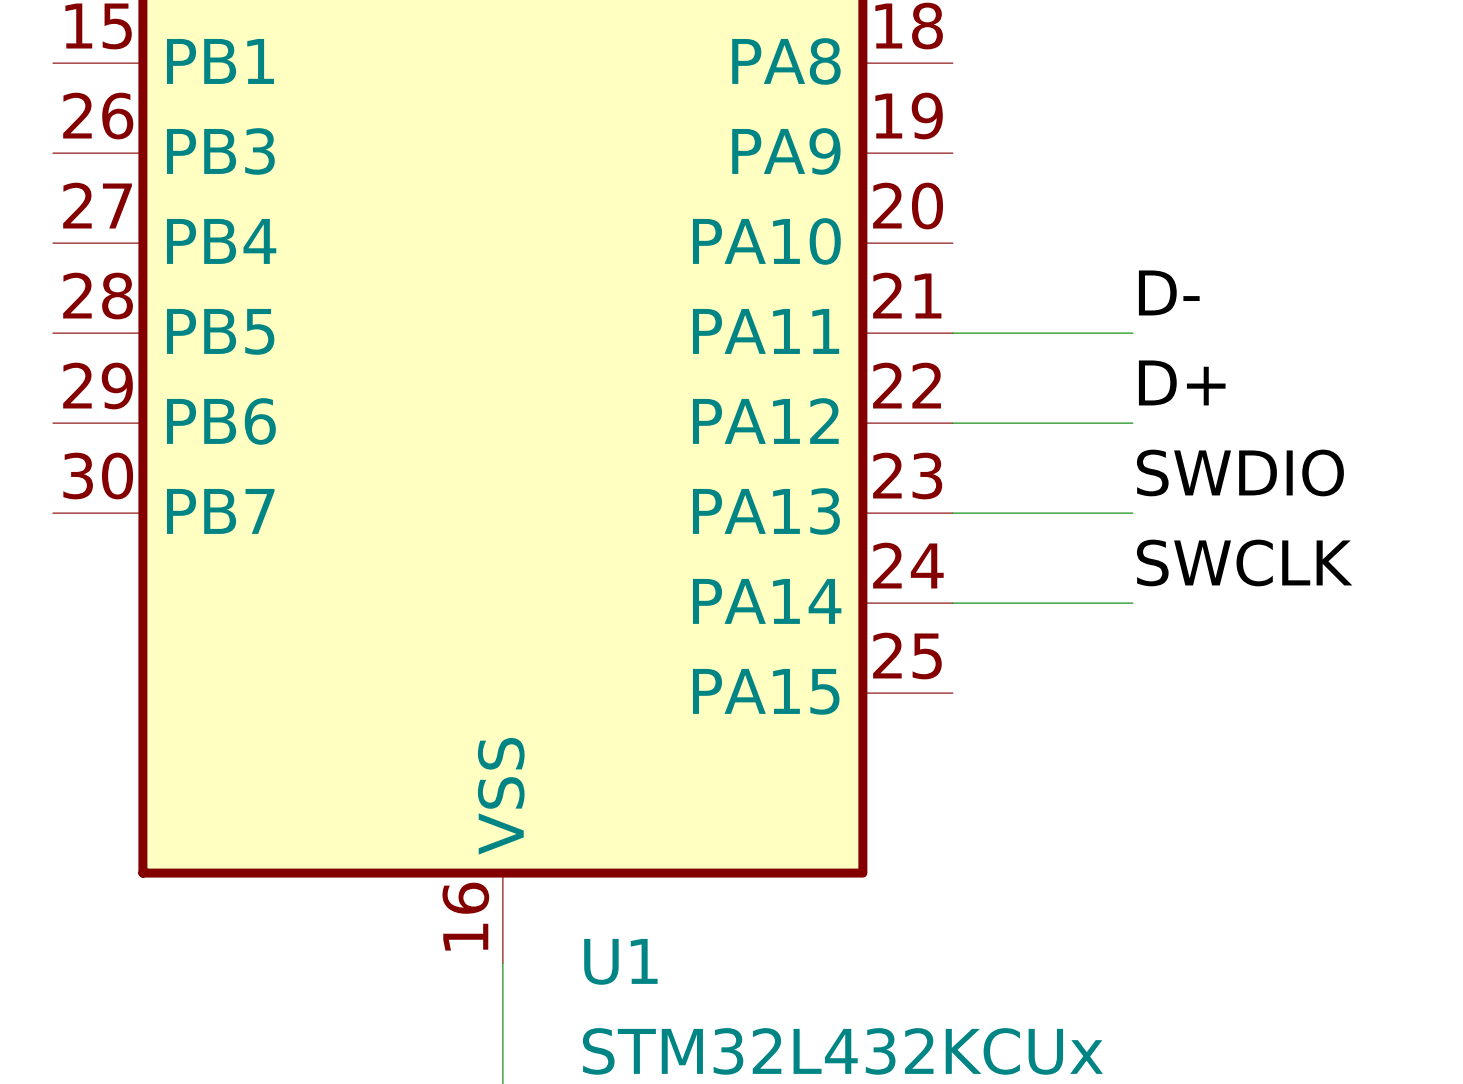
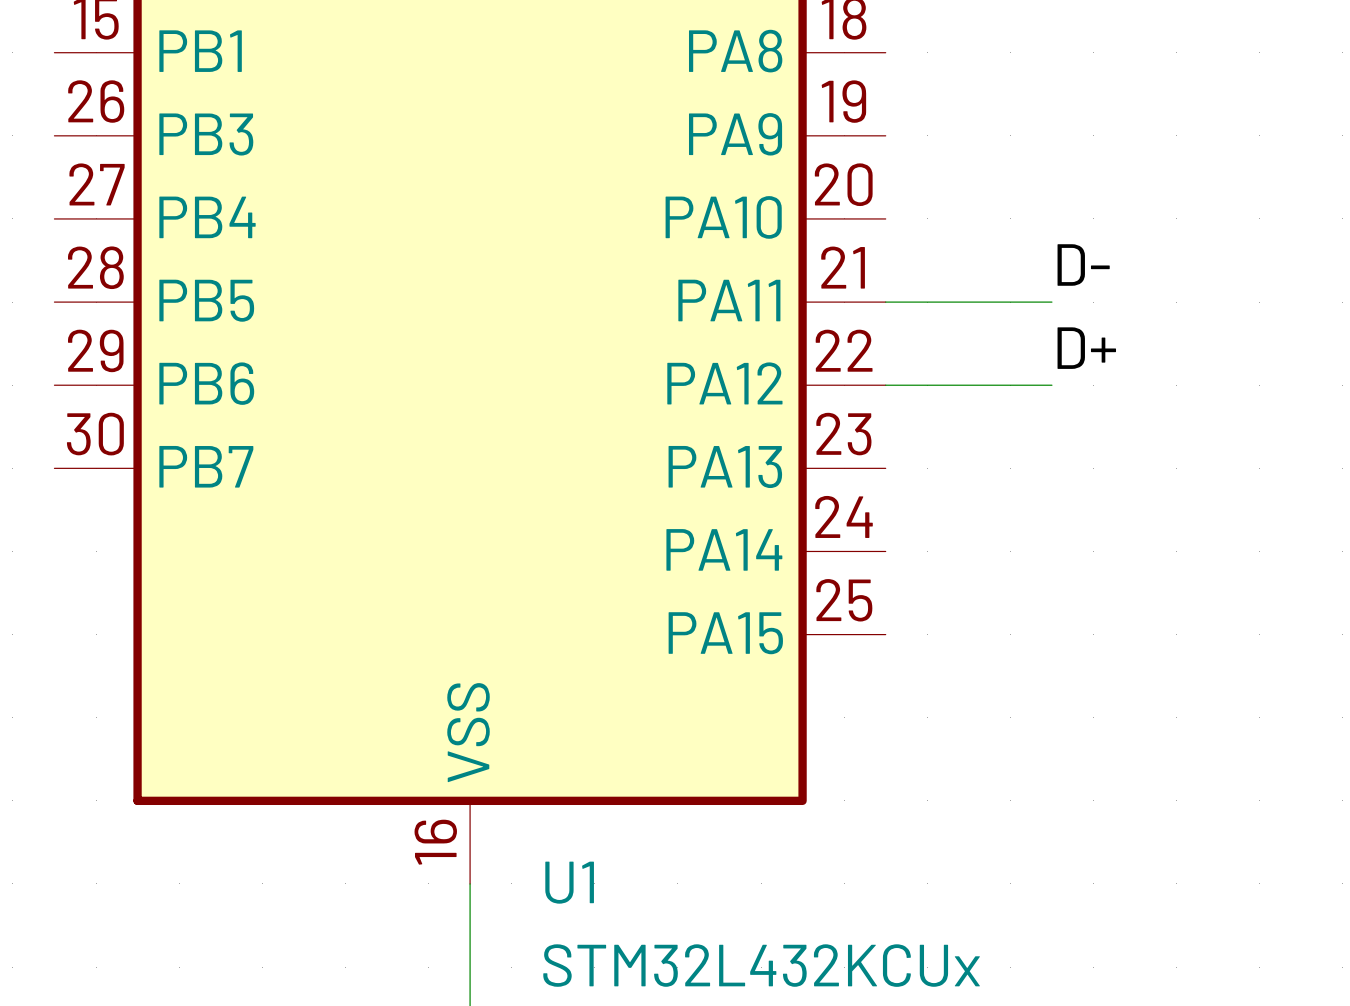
label: SWDIO (1240, 472) -> none
wire: (952, 513) (1132, 513) -> none
label: SWCLK (1244, 562) -> none
wire: (952, 603) (1132, 603) -> none

